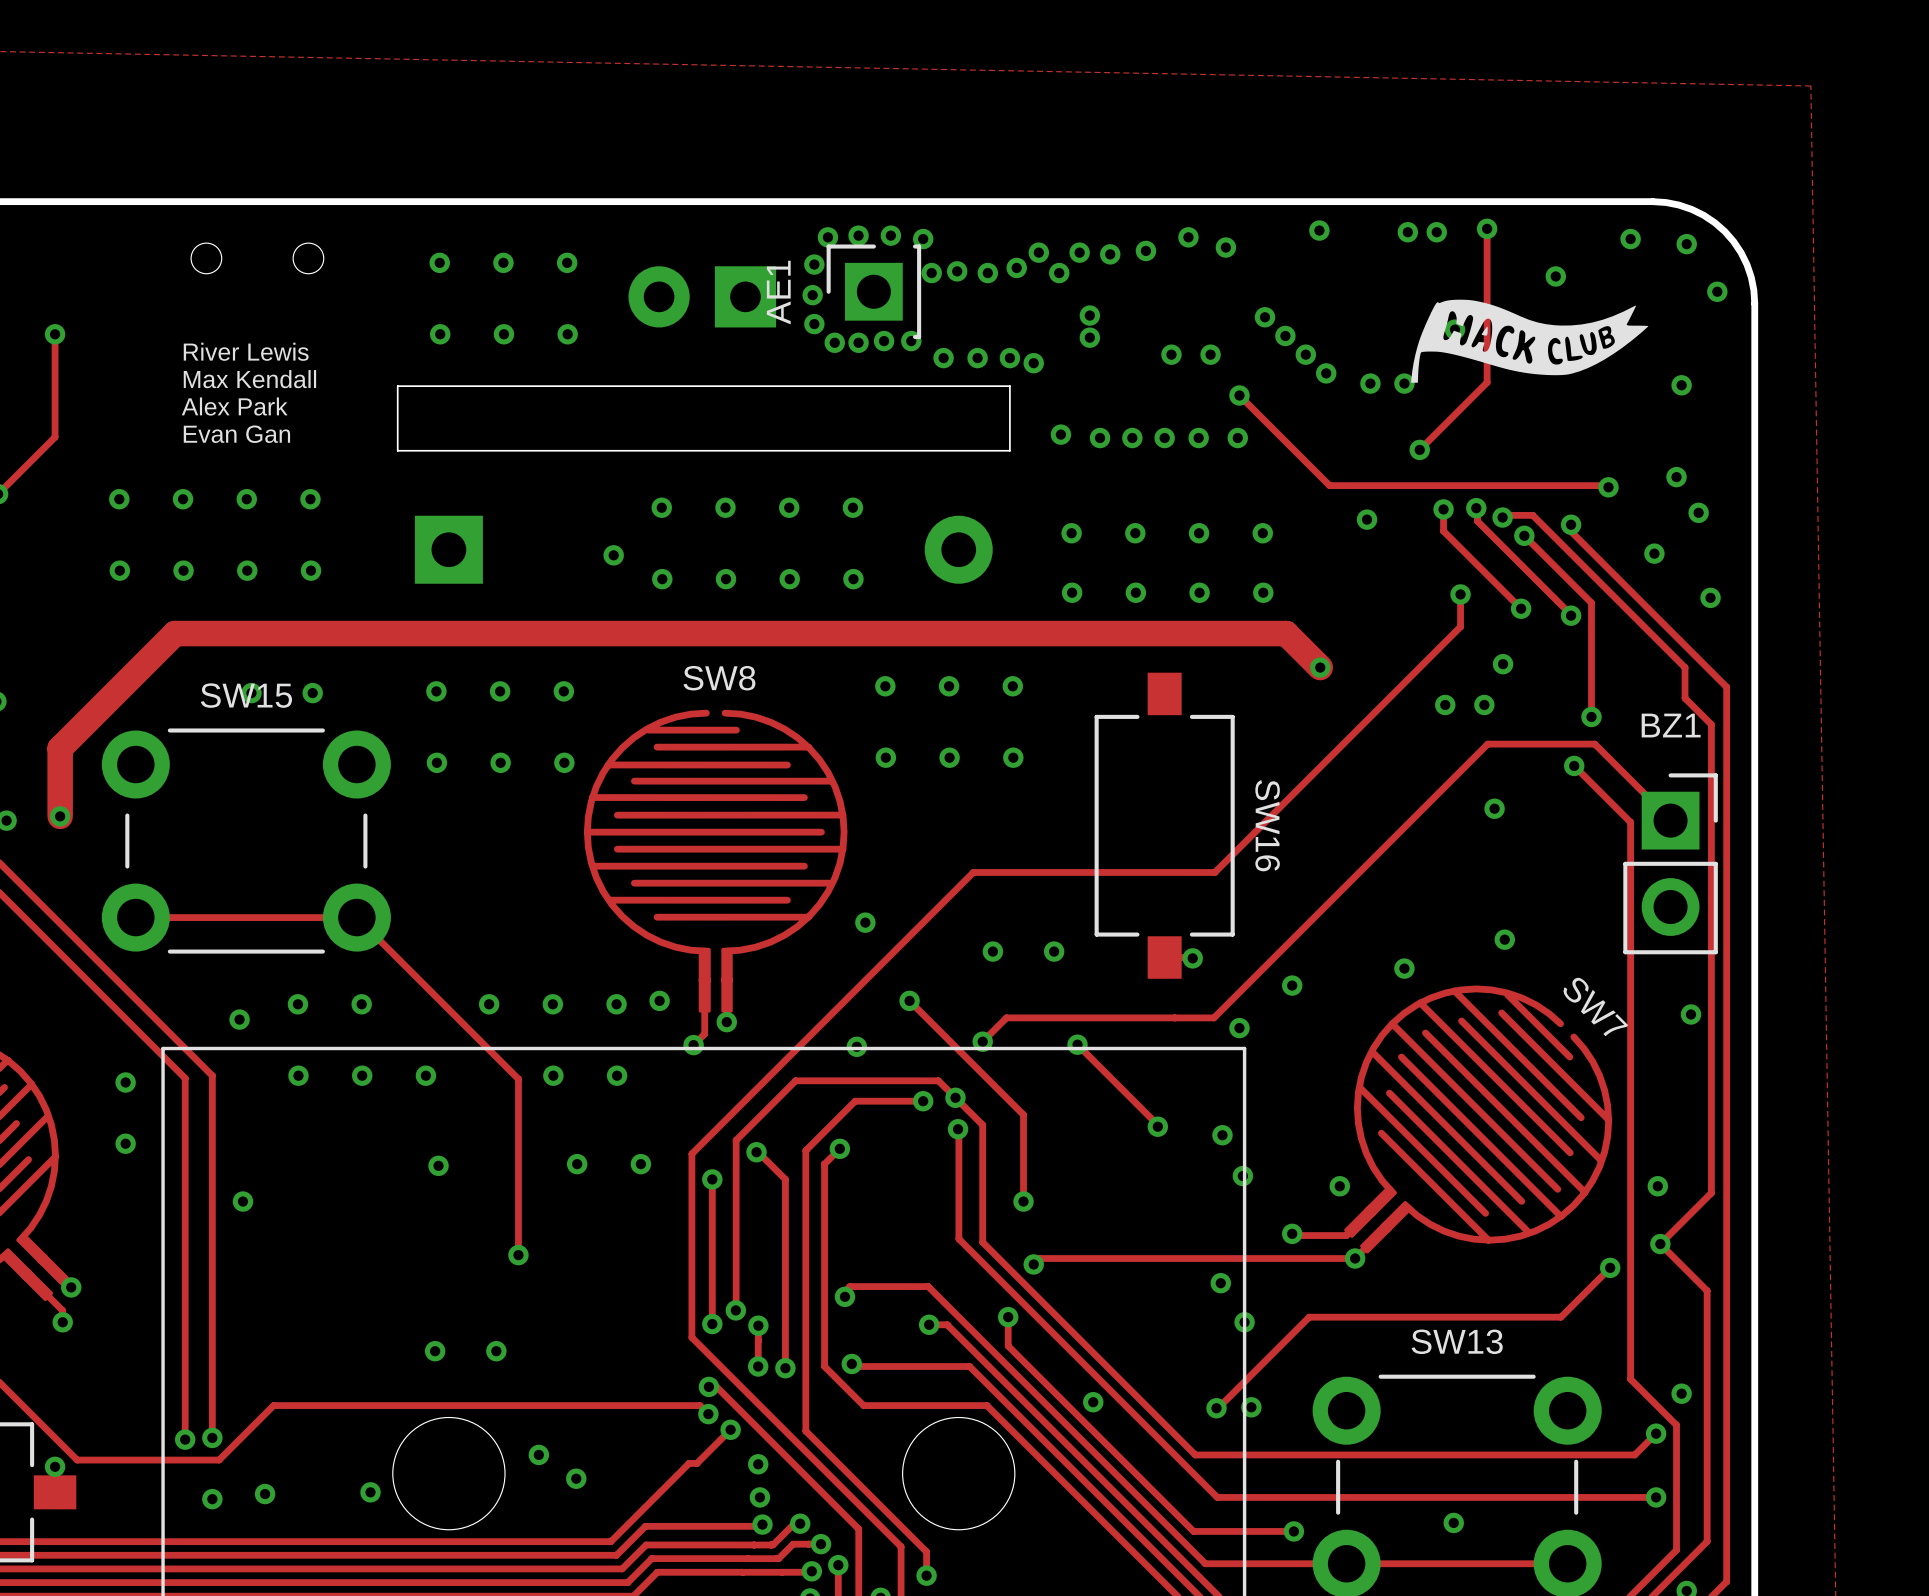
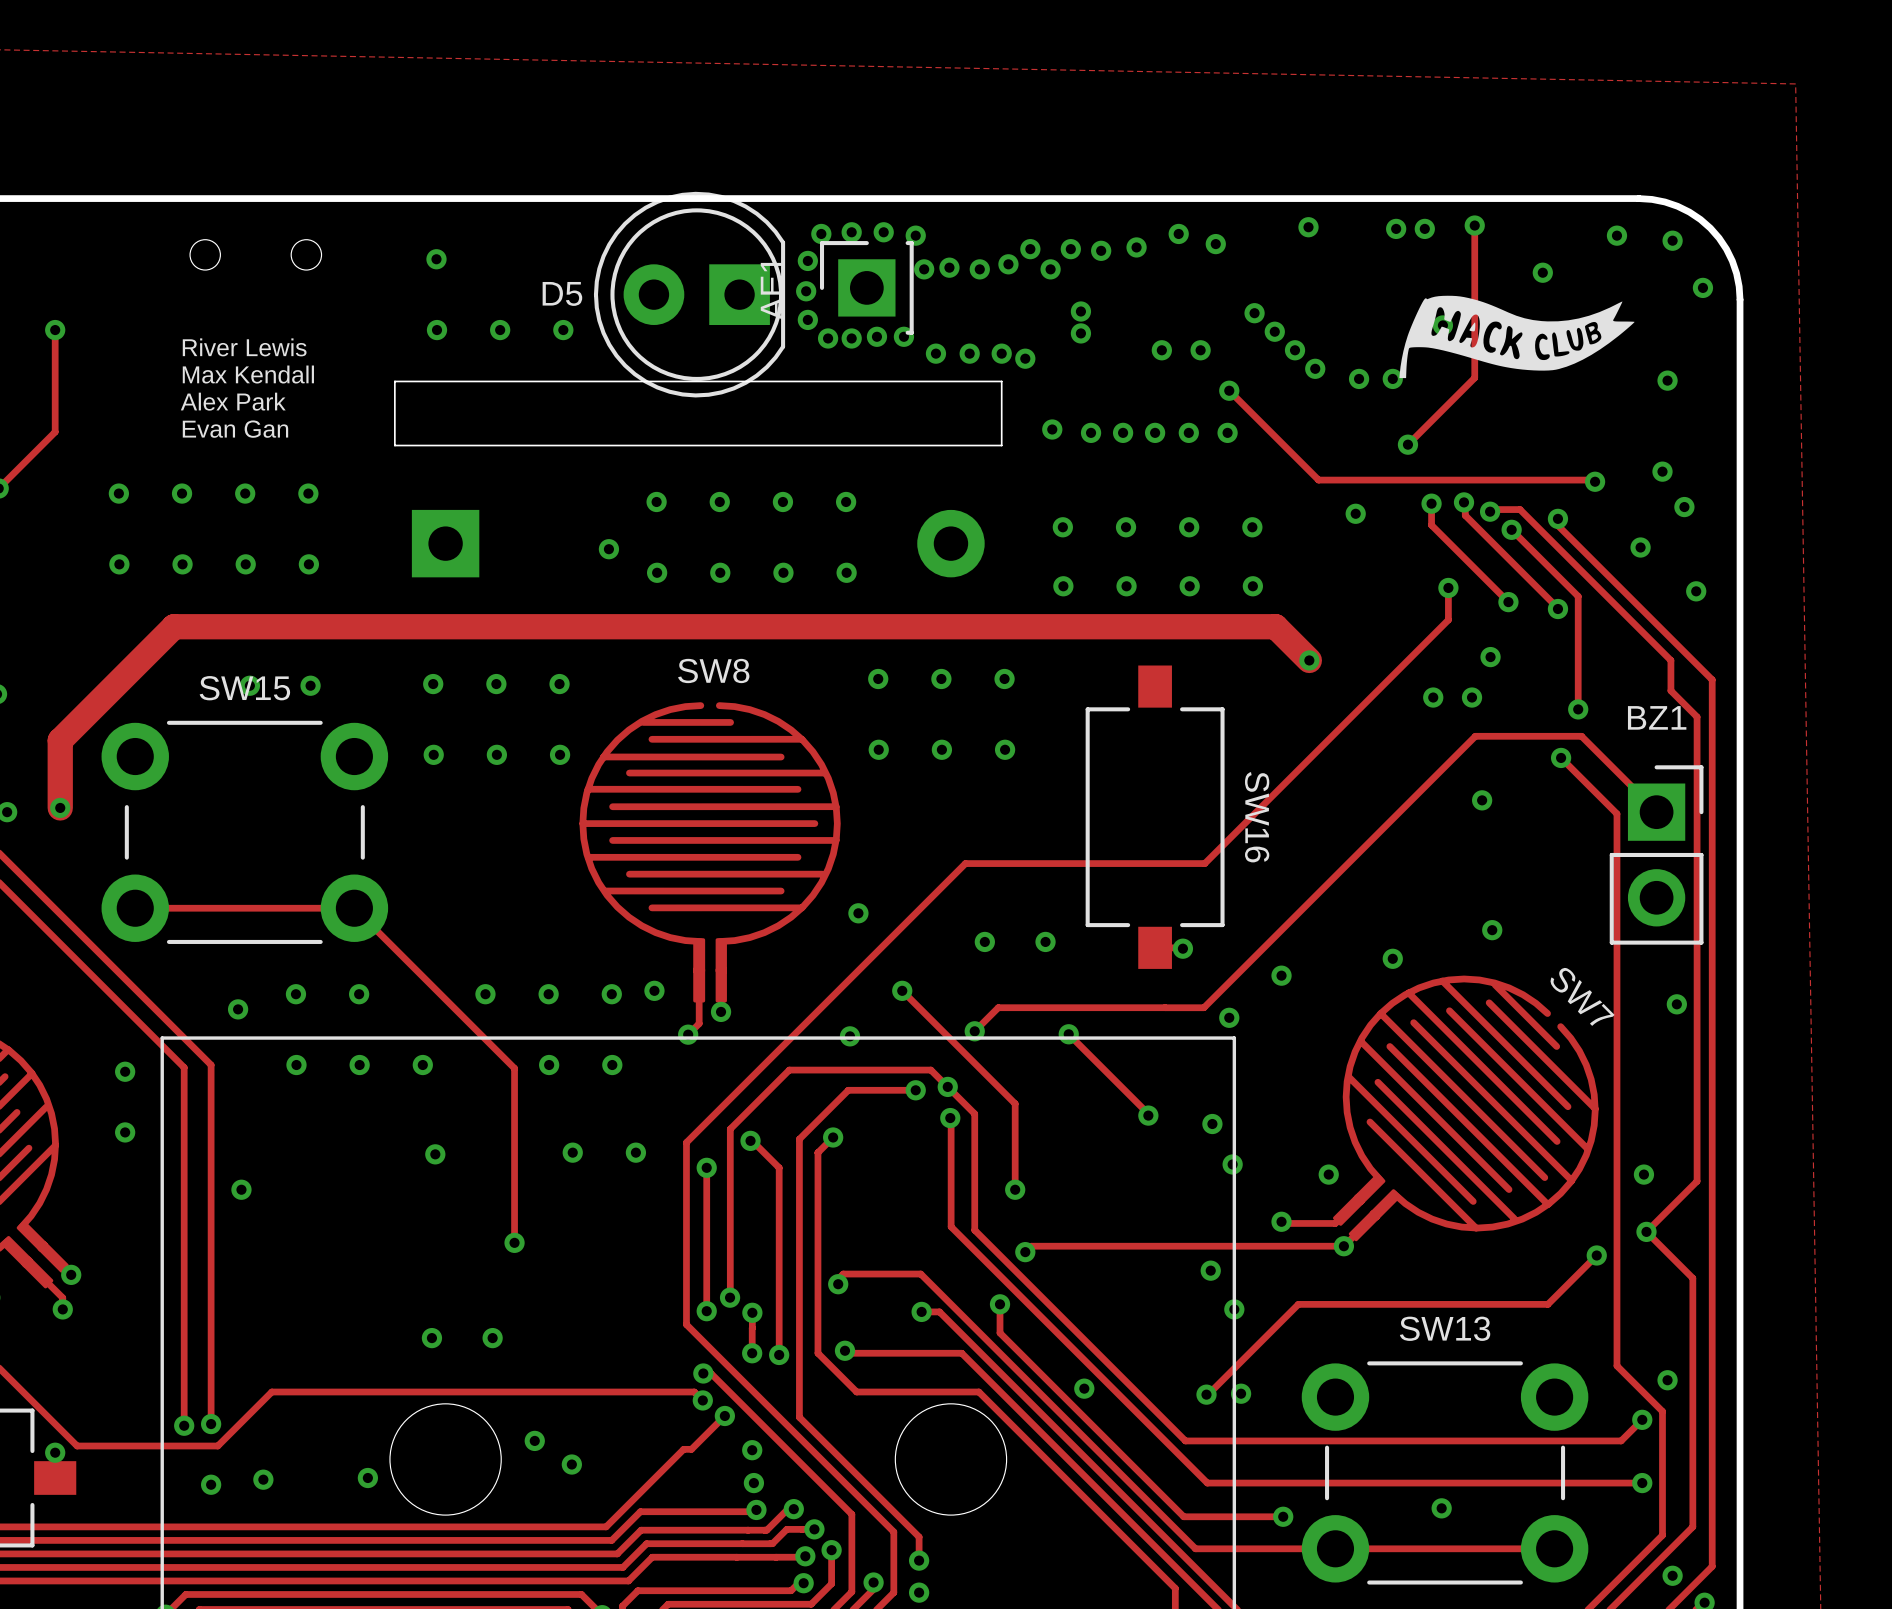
via: (503, 262) -> none
via: (567, 262) -> none
D5 side: bottom (702, 296) -> top (689, 294)

